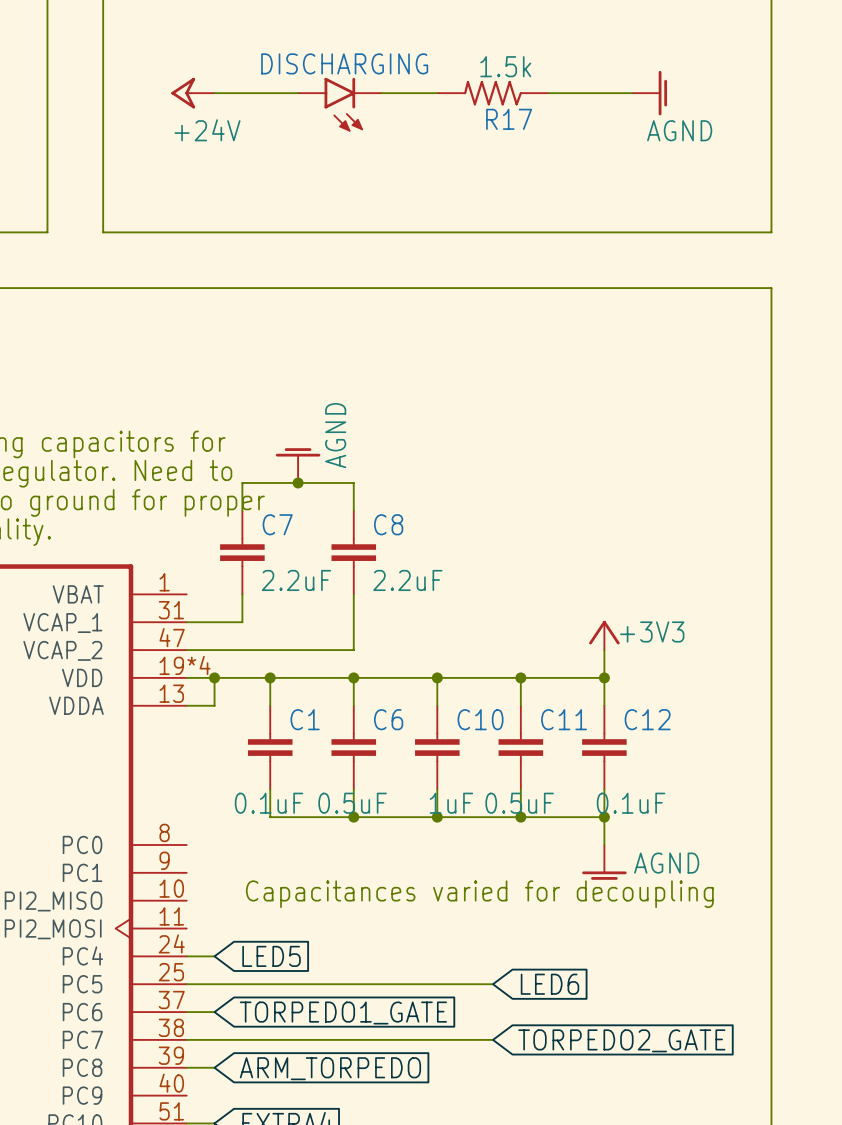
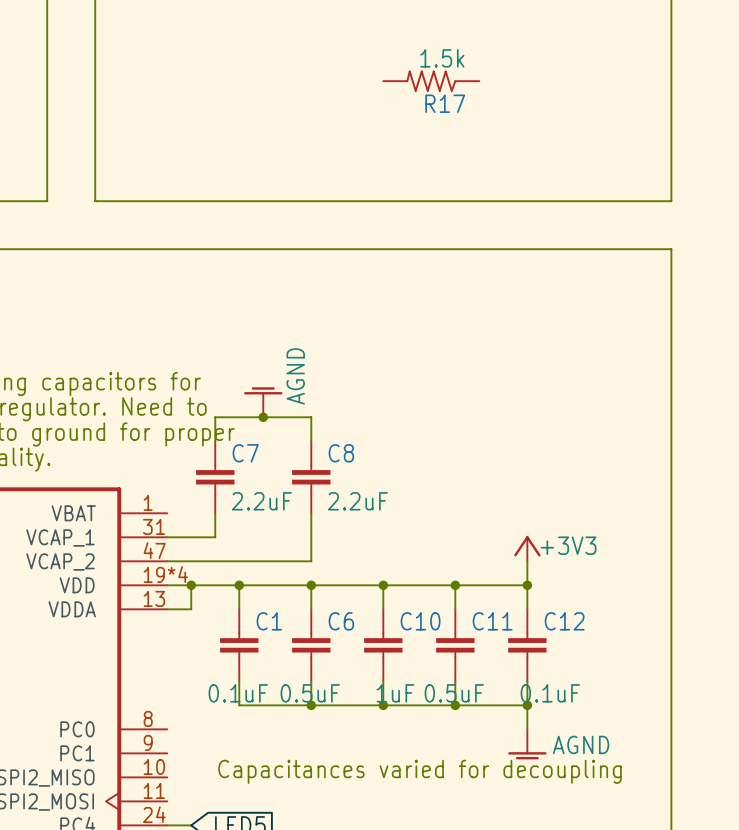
power symbol: +24V (192, 93) -> none
wire: (214, 93) (298, 93) -> none
wire: (381, 93) (437, 93) -> none
wire: (548, 93) (632, 93) -> none
power symbol: AGND (649, 93) -> none
DISCHARGING: (339, 104) -> none

